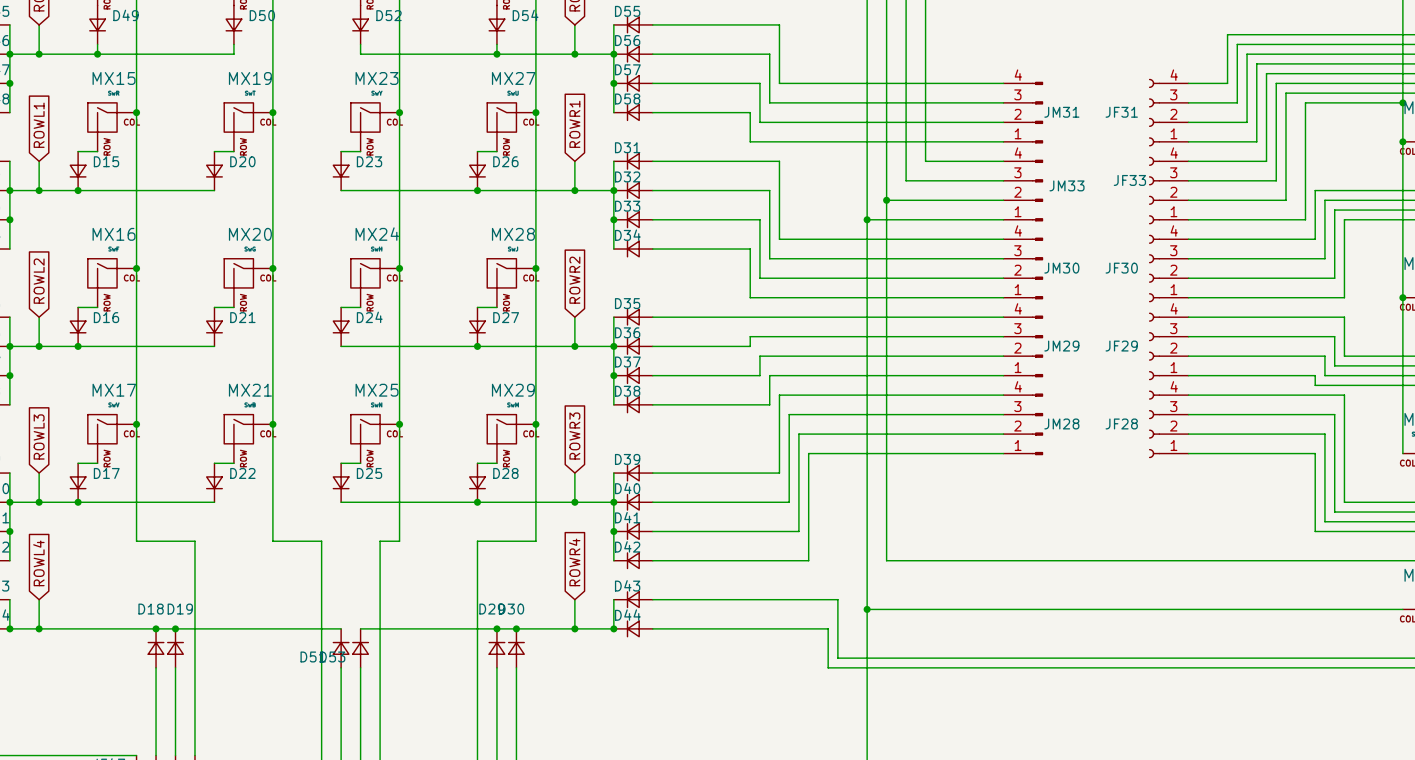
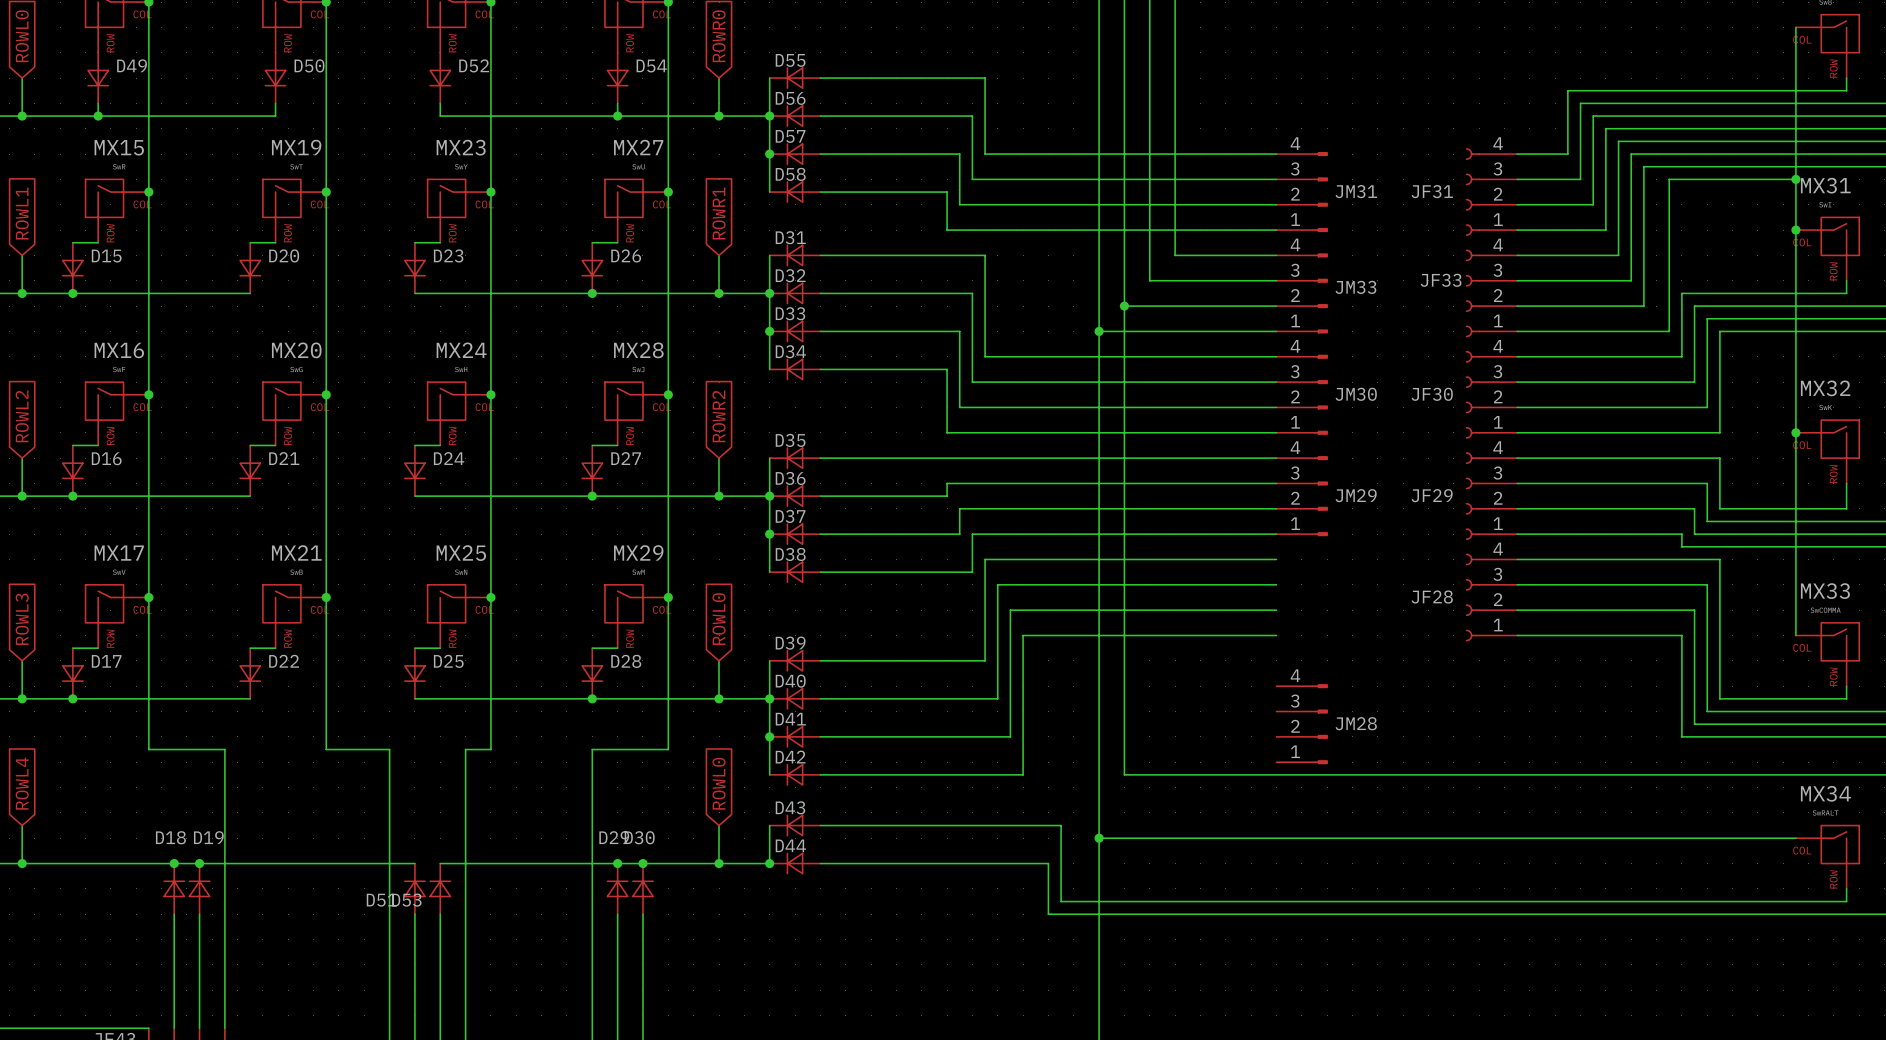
JM28 position: (1023, 424) -> (1302, 724)
global label: ROWR3 (574, 436) -> ROWL0 (719, 619)
global label: ROWR4 (574, 562) -> ROWL0 (719, 783)

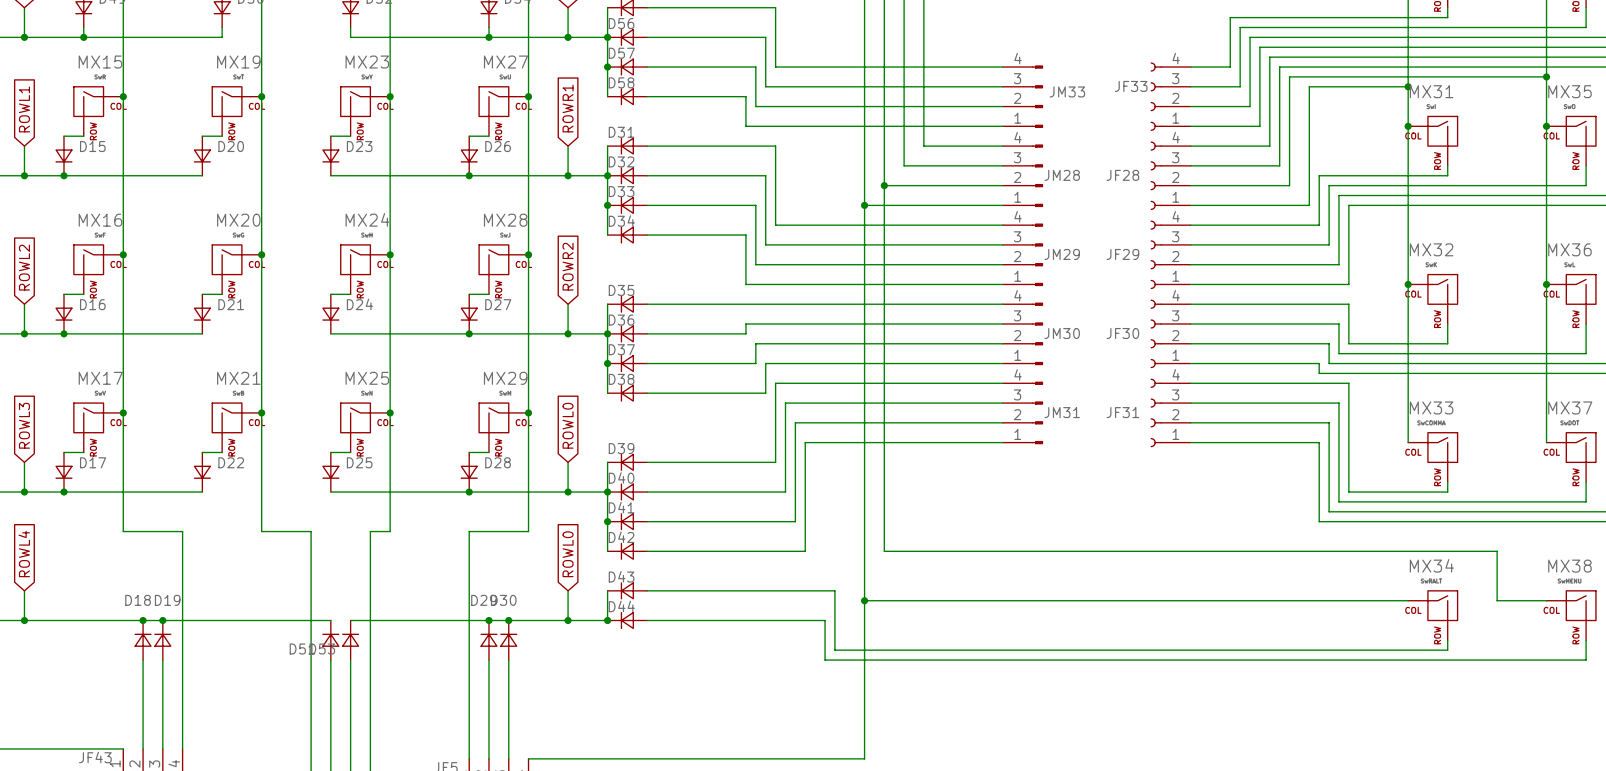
JM31 name: JM31 (1356, 191) -> JM33 (1067, 91)
JF31 name: JF31 (1432, 191) -> JF33 (1131, 86)
JF33 name: JF33 (1441, 280) -> JF28 (1122, 175)
JM33 name: JM33 (1355, 287) -> JM28 (1062, 175)
JM30 name: JM30 (1356, 394) -> JM29 (1062, 254)
JF30 name: JF30 (1432, 394) -> JF29 (1122, 254)
JM29 name: JM29 (1356, 495) -> JM30 (1062, 333)
JF29 name: JF29 (1432, 495) -> JF30 (1122, 333)
JM31: none -> (1023, 412)
JF28 name: JF28 (1432, 597) -> JF31 (1122, 412)
JM28: (1302, 724) -> none

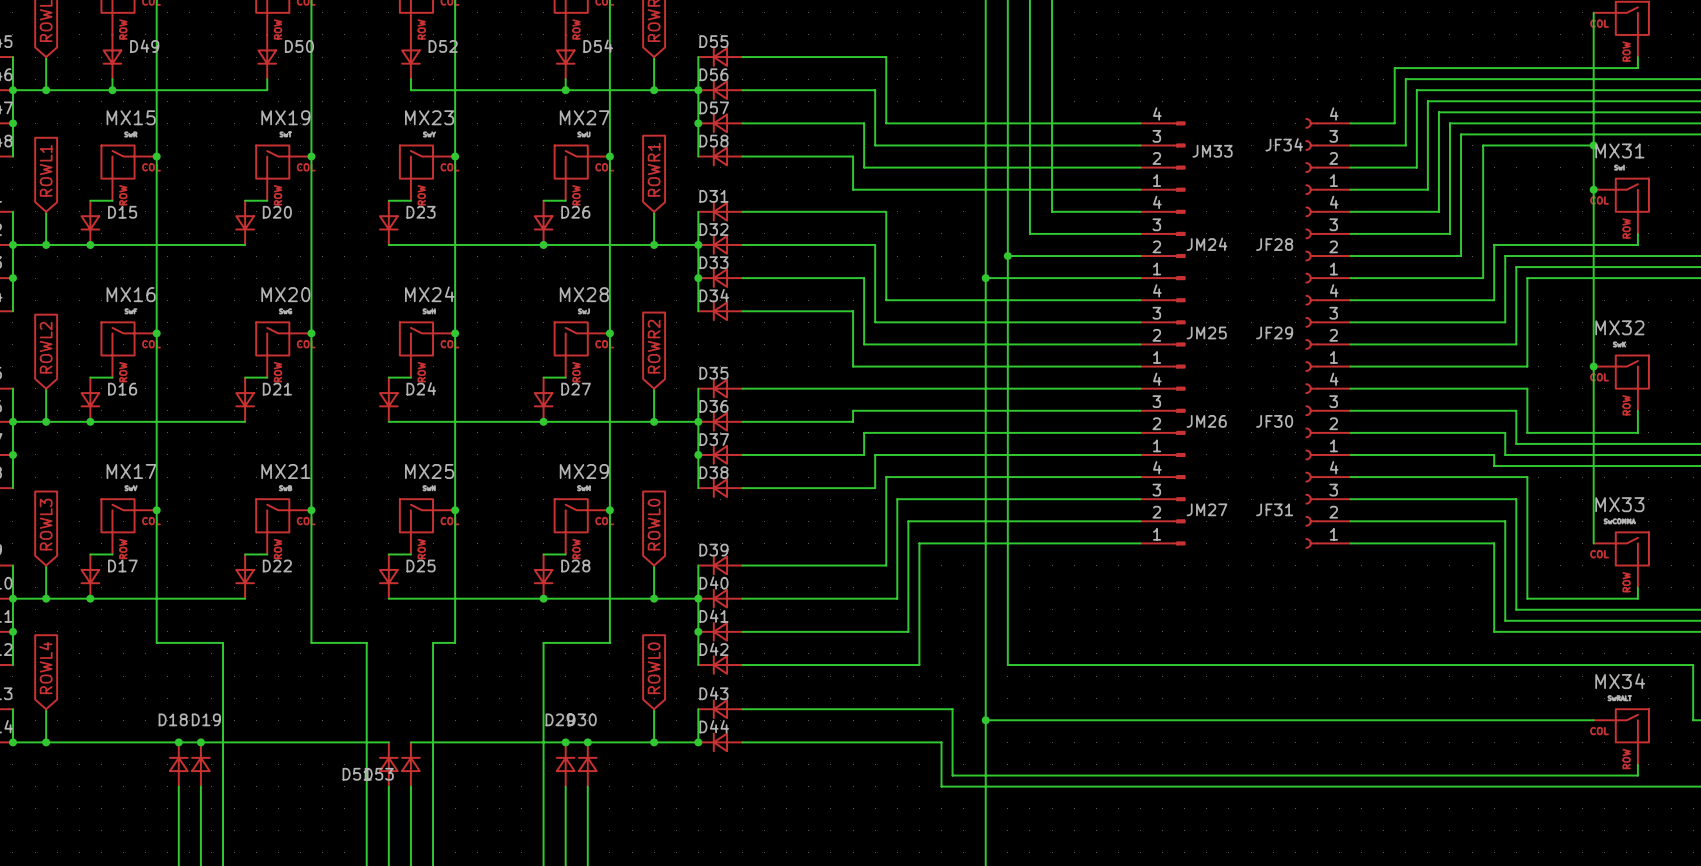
JF33 name: JF33 (1131, 86) -> JF34 (1284, 144)
JM28 name: JM28 (1062, 175) -> JM24 (1206, 244)
JM29 name: JM29 (1062, 254) -> JM25 (1206, 332)
JM30 name: JM30 (1062, 333) -> JM26 (1206, 421)
JM31 name: JM31 (1062, 412) -> JM27 (1206, 509)

